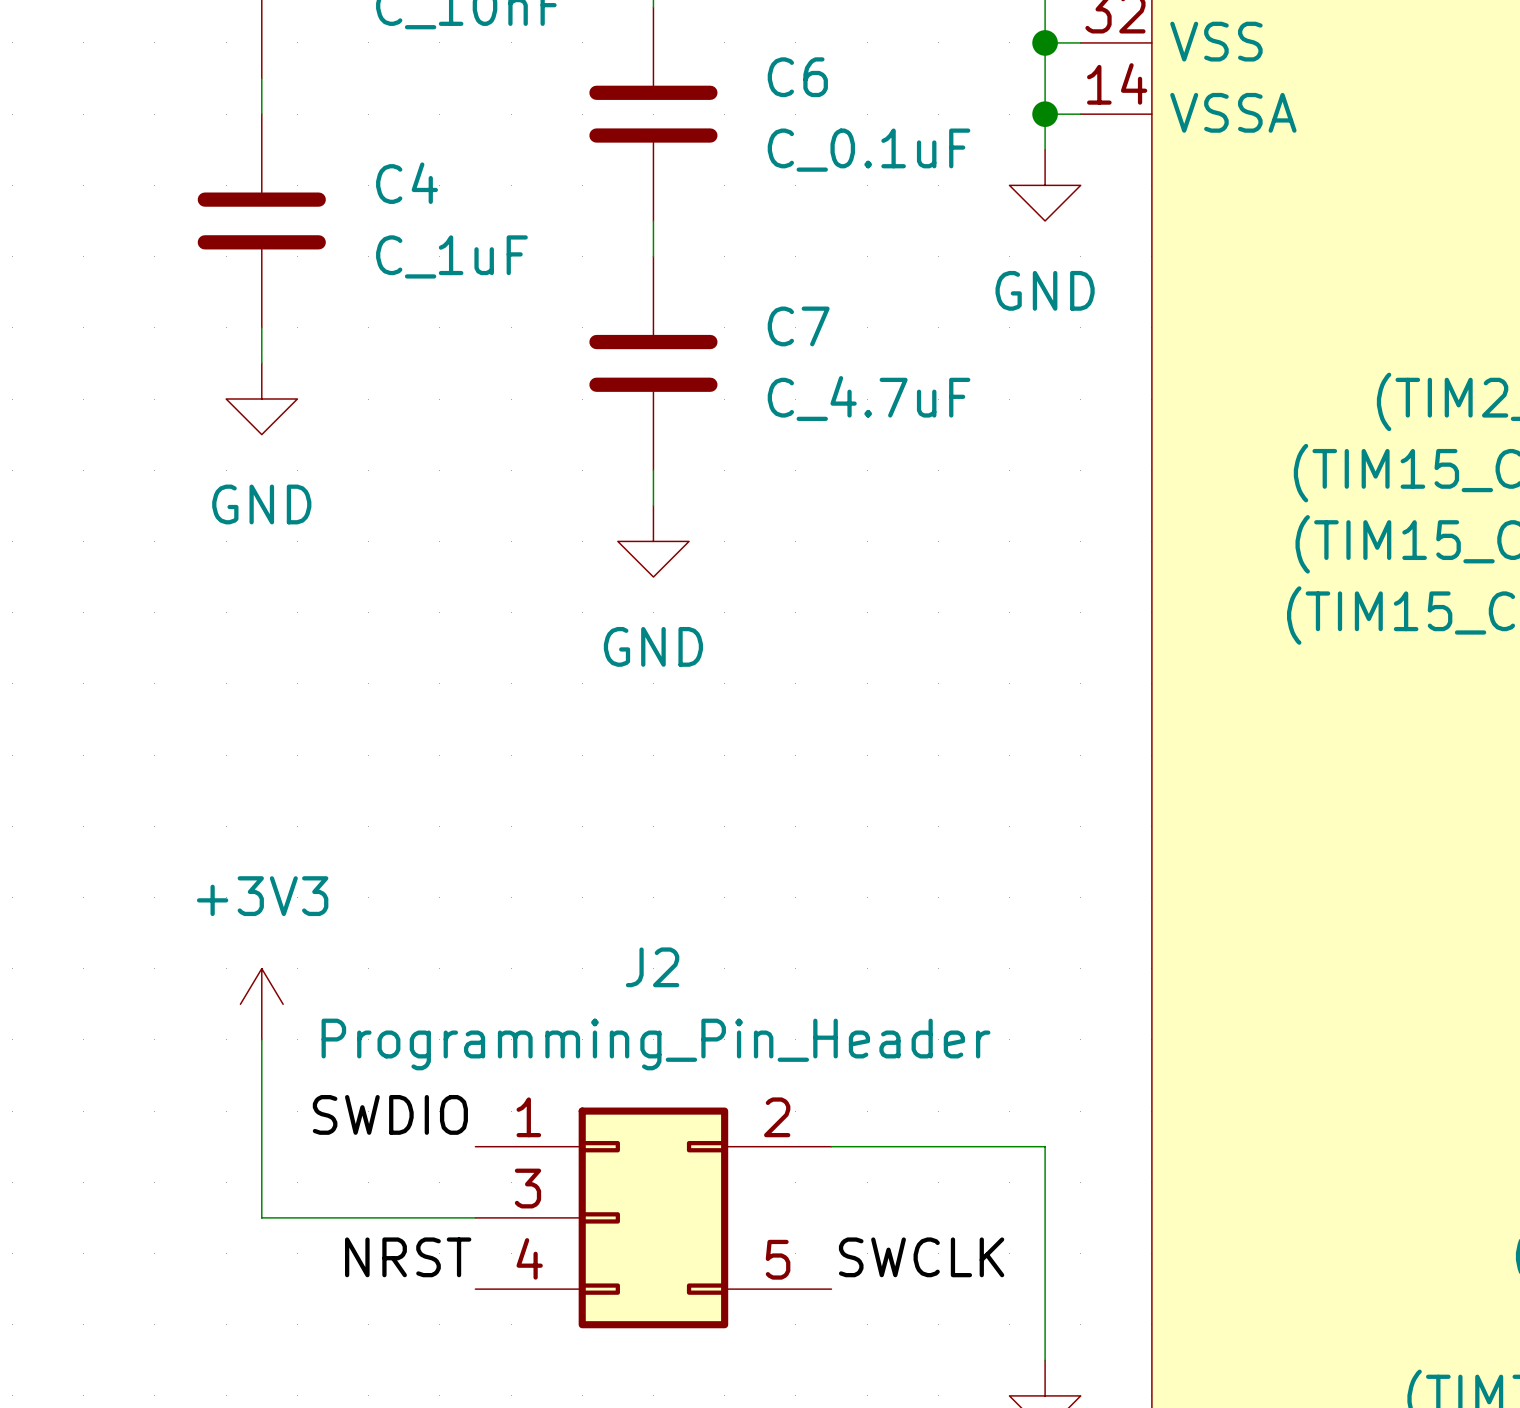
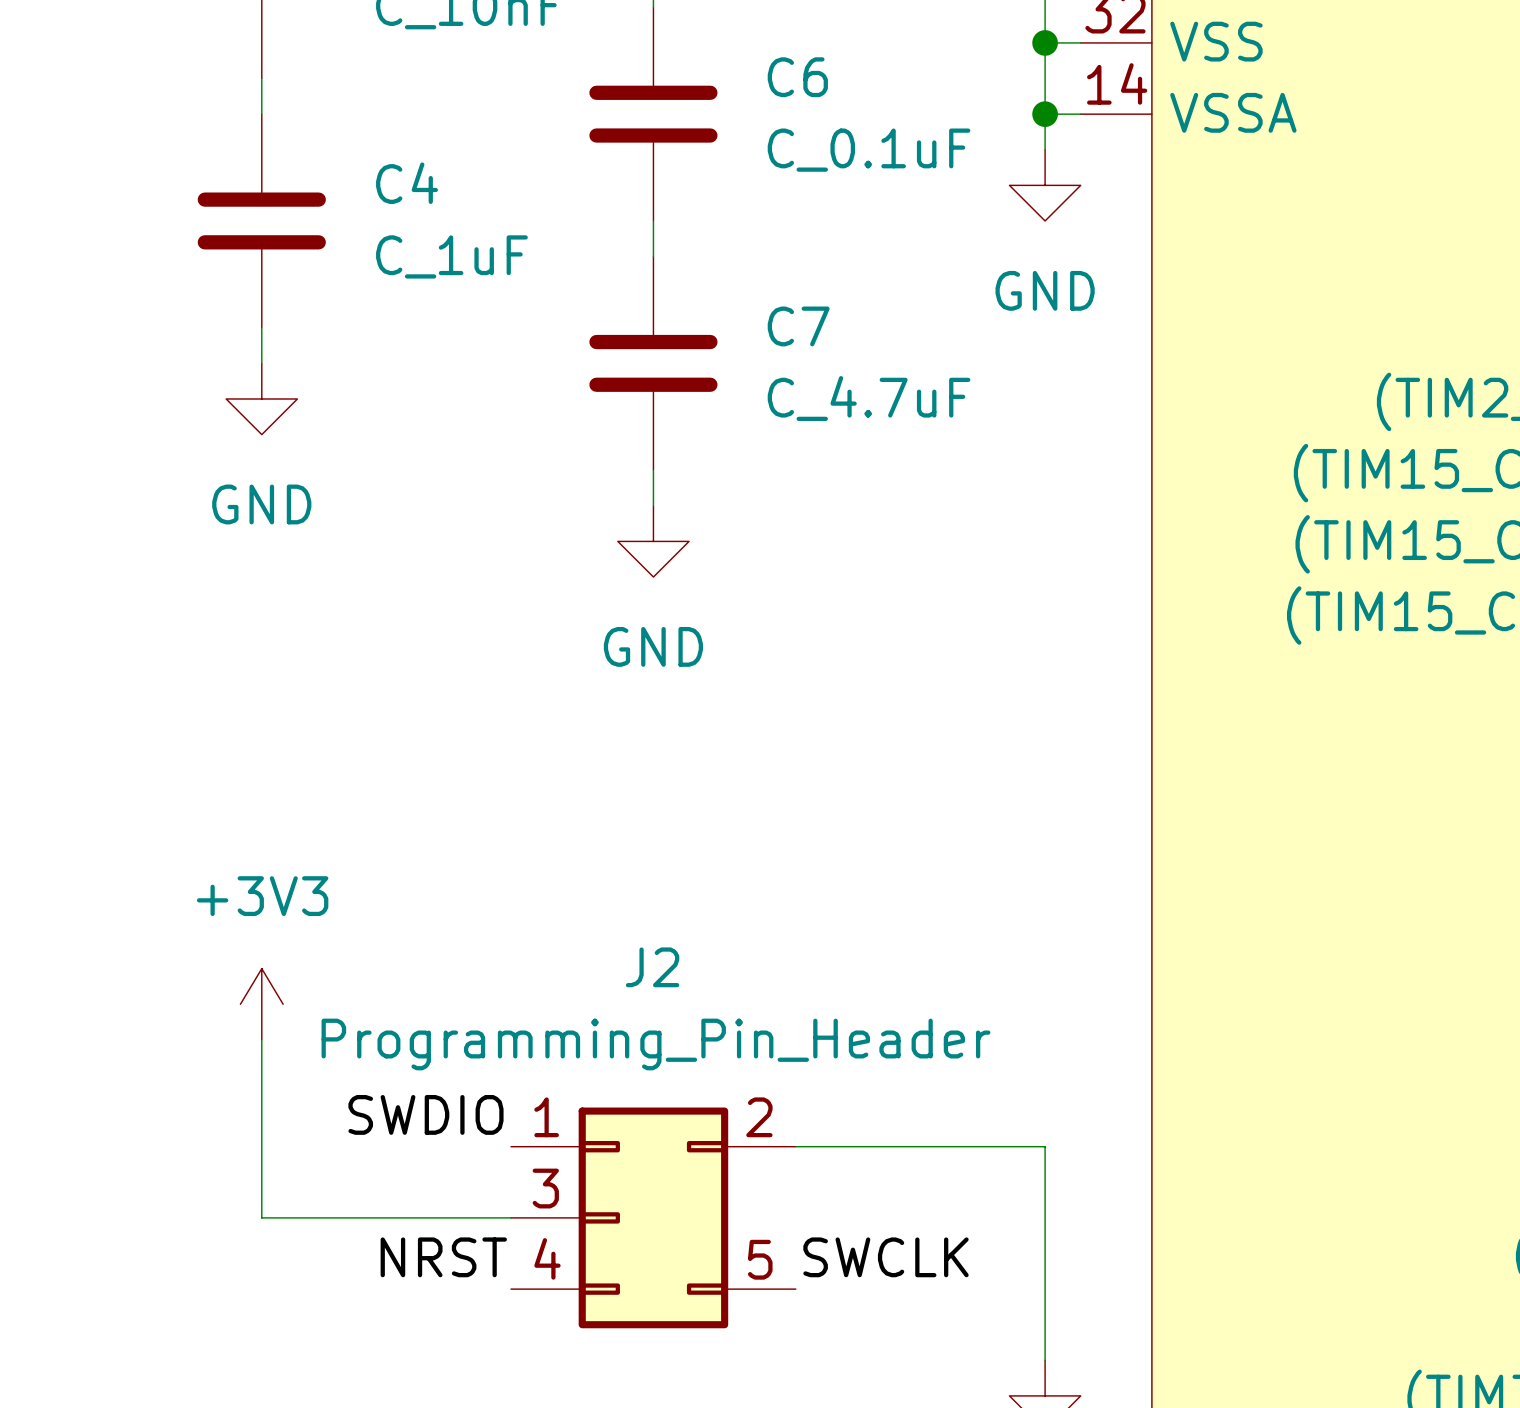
J2 symbol: [475, 1107, 832, 1329] -> [511, 1107, 796, 1329]
label position: SWDIO (390, 1114) -> SWDIO (425, 1114)
label position: NRST (408, 1257) -> NRST (443, 1257)
label position: SWCLK (921, 1257) -> SWCLK (885, 1257)

